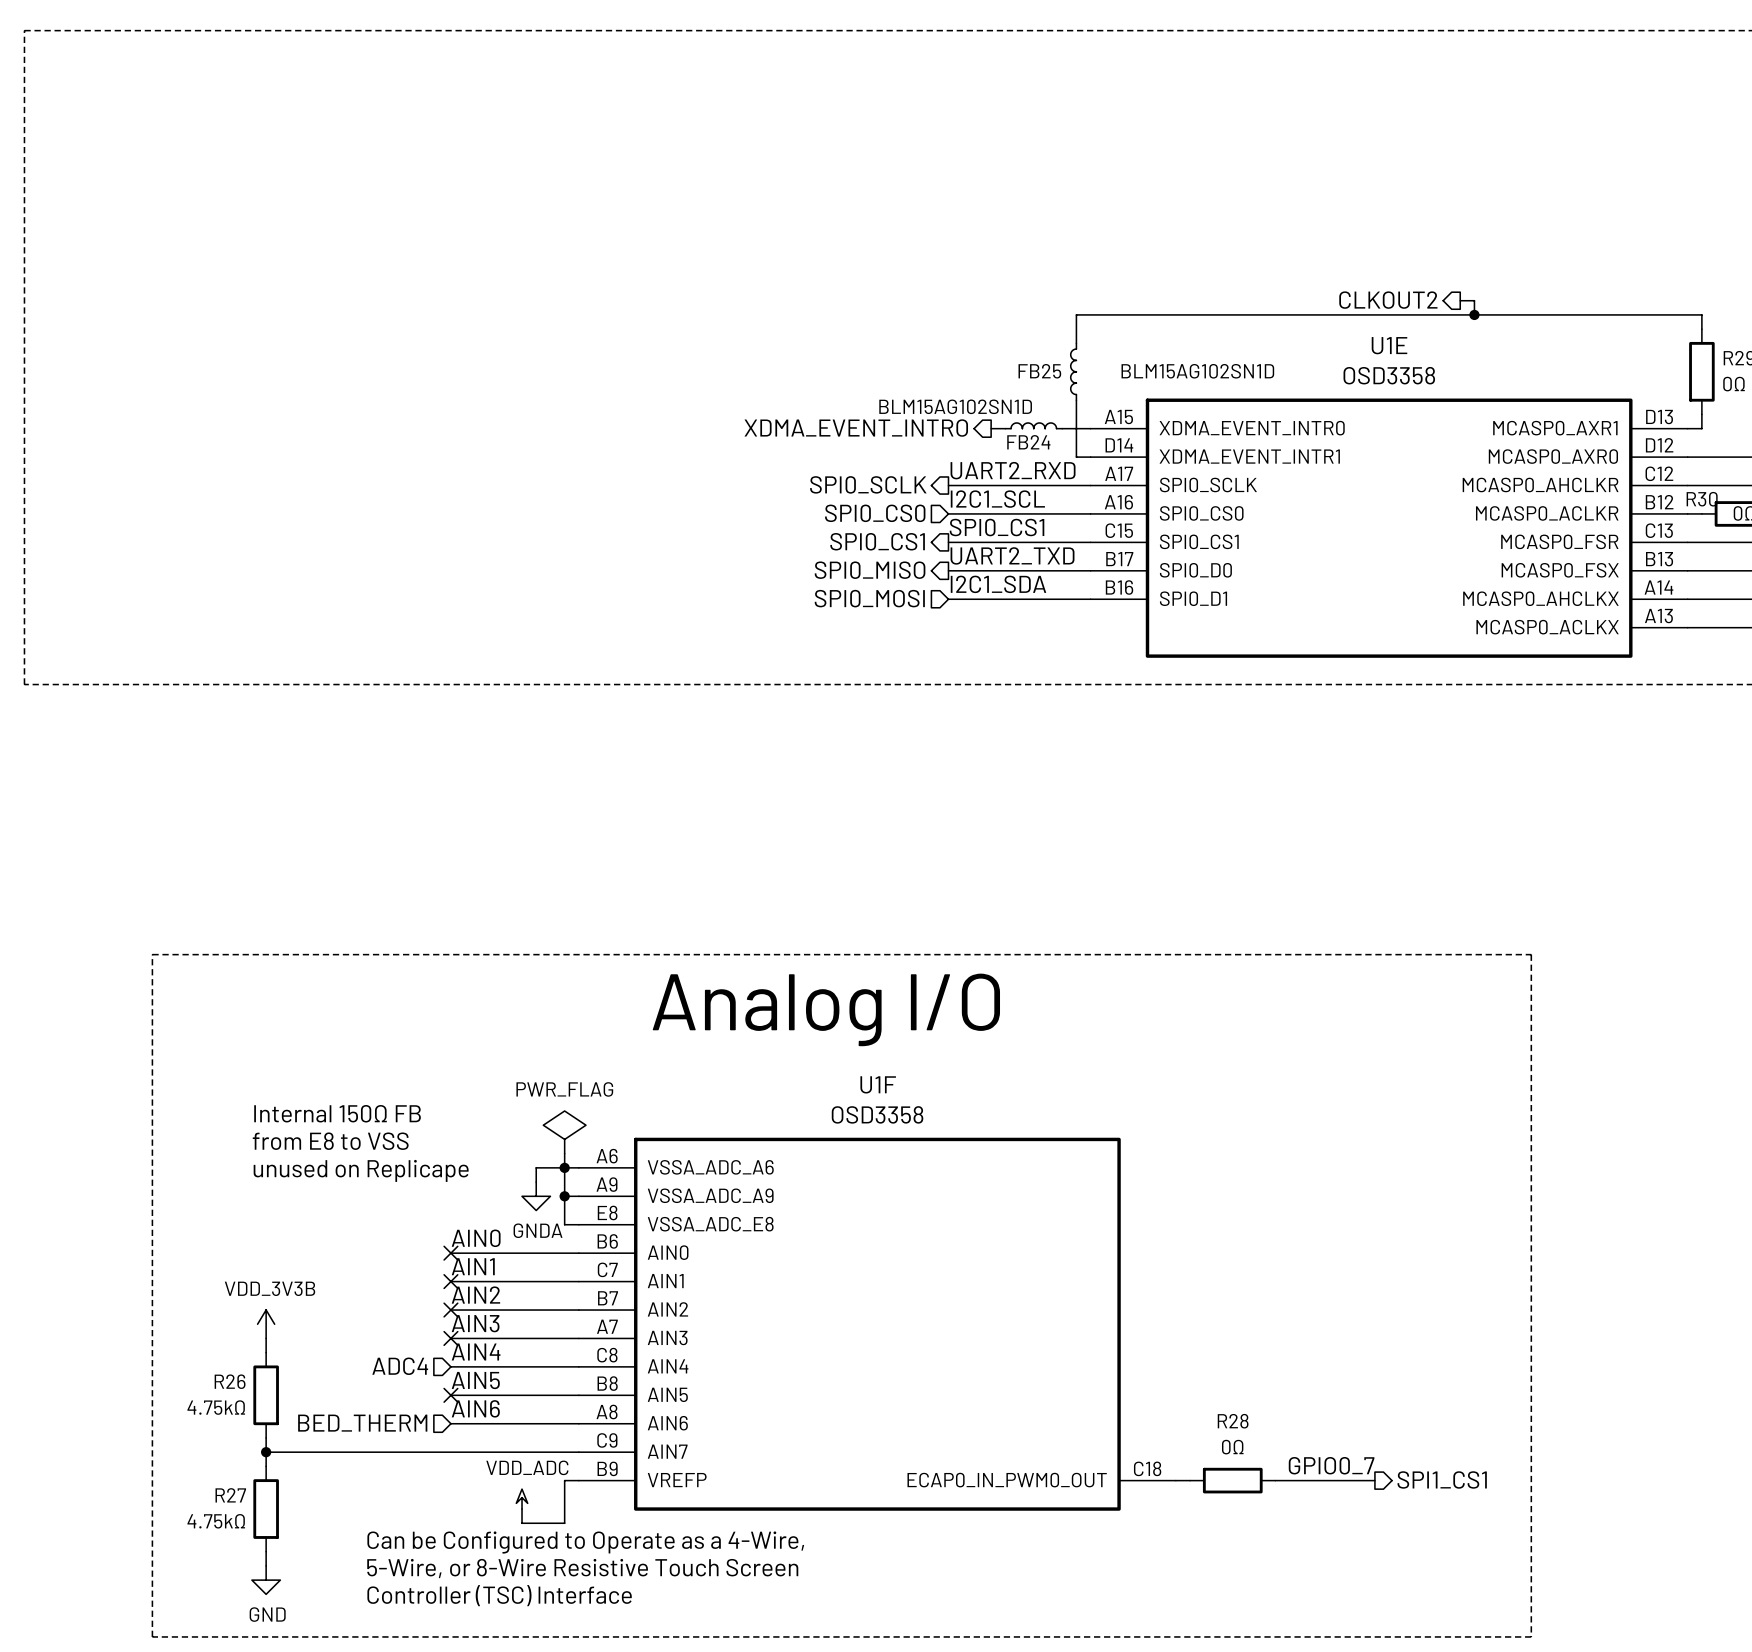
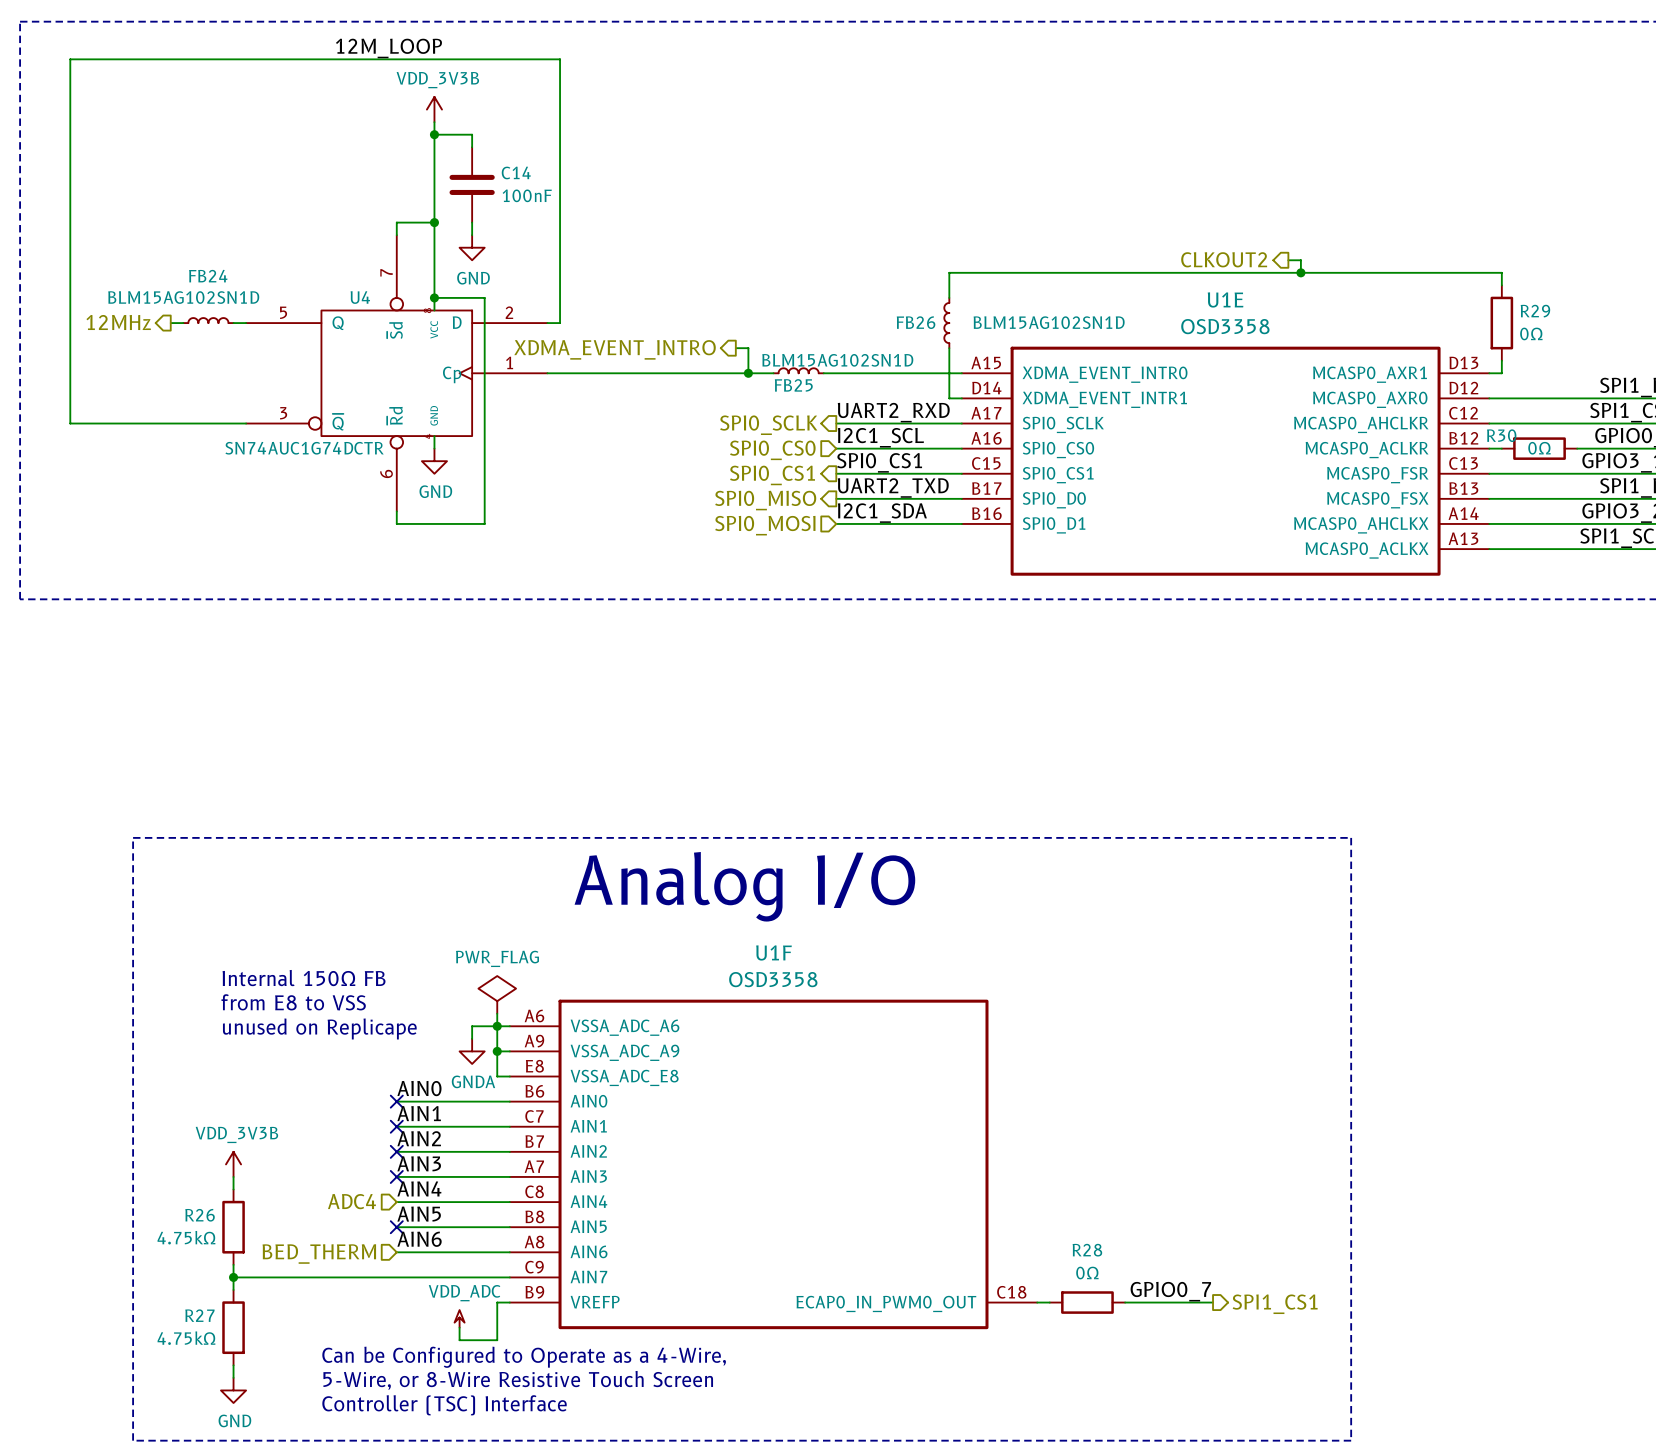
label: none -> 12M_LOOP (388, 48)
power symbol: none -> VDD_3V3B (434, 109)
wire: none -> (434, 122) (434, 310)
wire: none -> (434, 134) (472, 134) (472, 147)
junction: none -> (434, 134)
C14: none -> 100nF (472, 184)
wire: none -> (434, 222) (396, 222) (396, 235)
junction: none -> (434, 222)
wire: none -> (472, 222) (472, 235)
power symbol: none -> GND (472, 247)
wire: none -> (434, 297) (484, 297) (484, 523) (396, 523) (396, 511)
junction: none -> (434, 297)
hierarchical label: none -> 12MHz (118, 322)
wire: none -> (170, 323) (183, 323)
wire: none -> (233, 323) (246, 323)
wire: none -> (547, 323) (560, 323) (560, 59) (70, 59) (70, 423) (246, 423)
FB25 name: FB25 (1039, 371) -> FB26 (916, 322)
wire: none -> (735, 348) (748, 348) (748, 373)
FB24 value position: BLM15AG102SN1D (955, 406) -> BLM15AG102SN1D (183, 297)
FB25: none -> BLM15AG102SN1D (798, 370)
FB24 position: (1033, 425) -> (208, 320)
U4: none -> SN74AUC1G74DCTR (396, 373)
wire: none -> (547, 373) (773, 373)
junction: none -> (748, 373)
hierarchical label position: XDMA_EVENT_INTRO (856, 428) -> XDMA_EVENT_INTRO (615, 349)
wire: none -> (823, 373) (873, 373)
wire: none -> (886, 373) (936, 373)
FB24 name position: FB24 (1028, 442) -> FB24 (208, 276)
wire: none -> (434, 436) (434, 448)
power symbol: none -> GND (434, 461)

